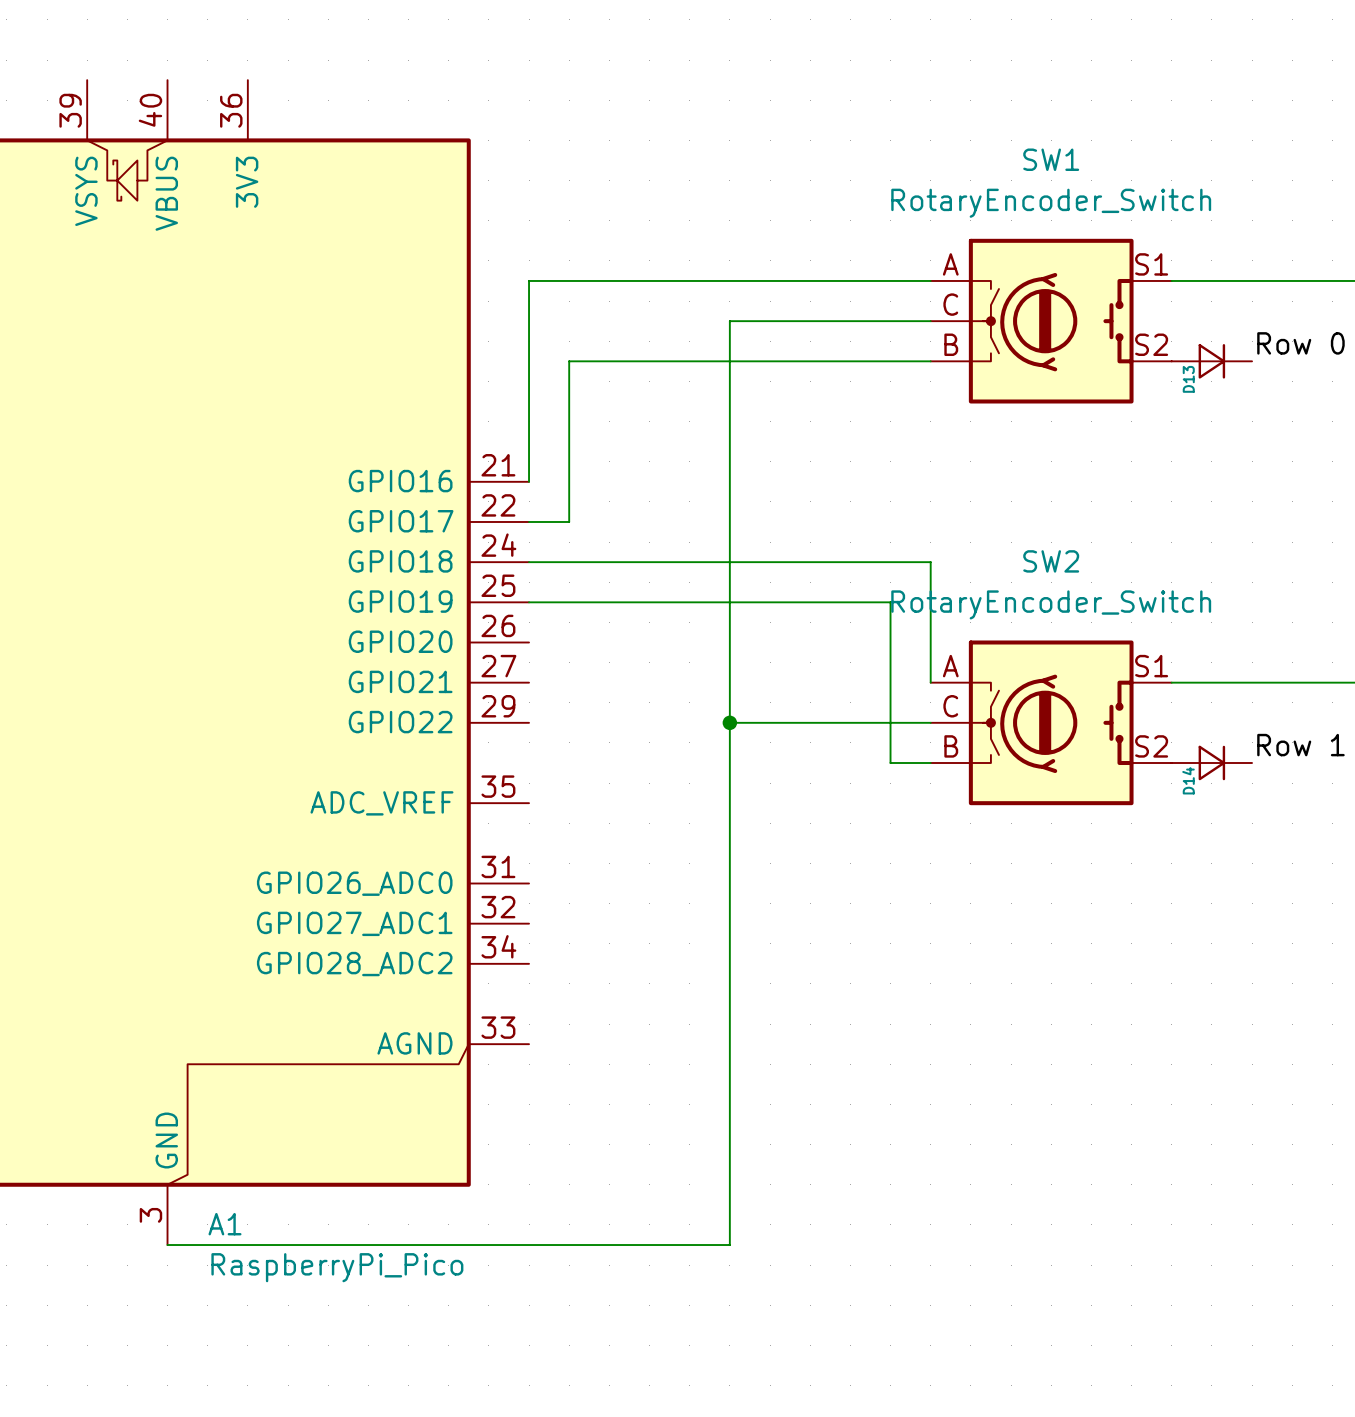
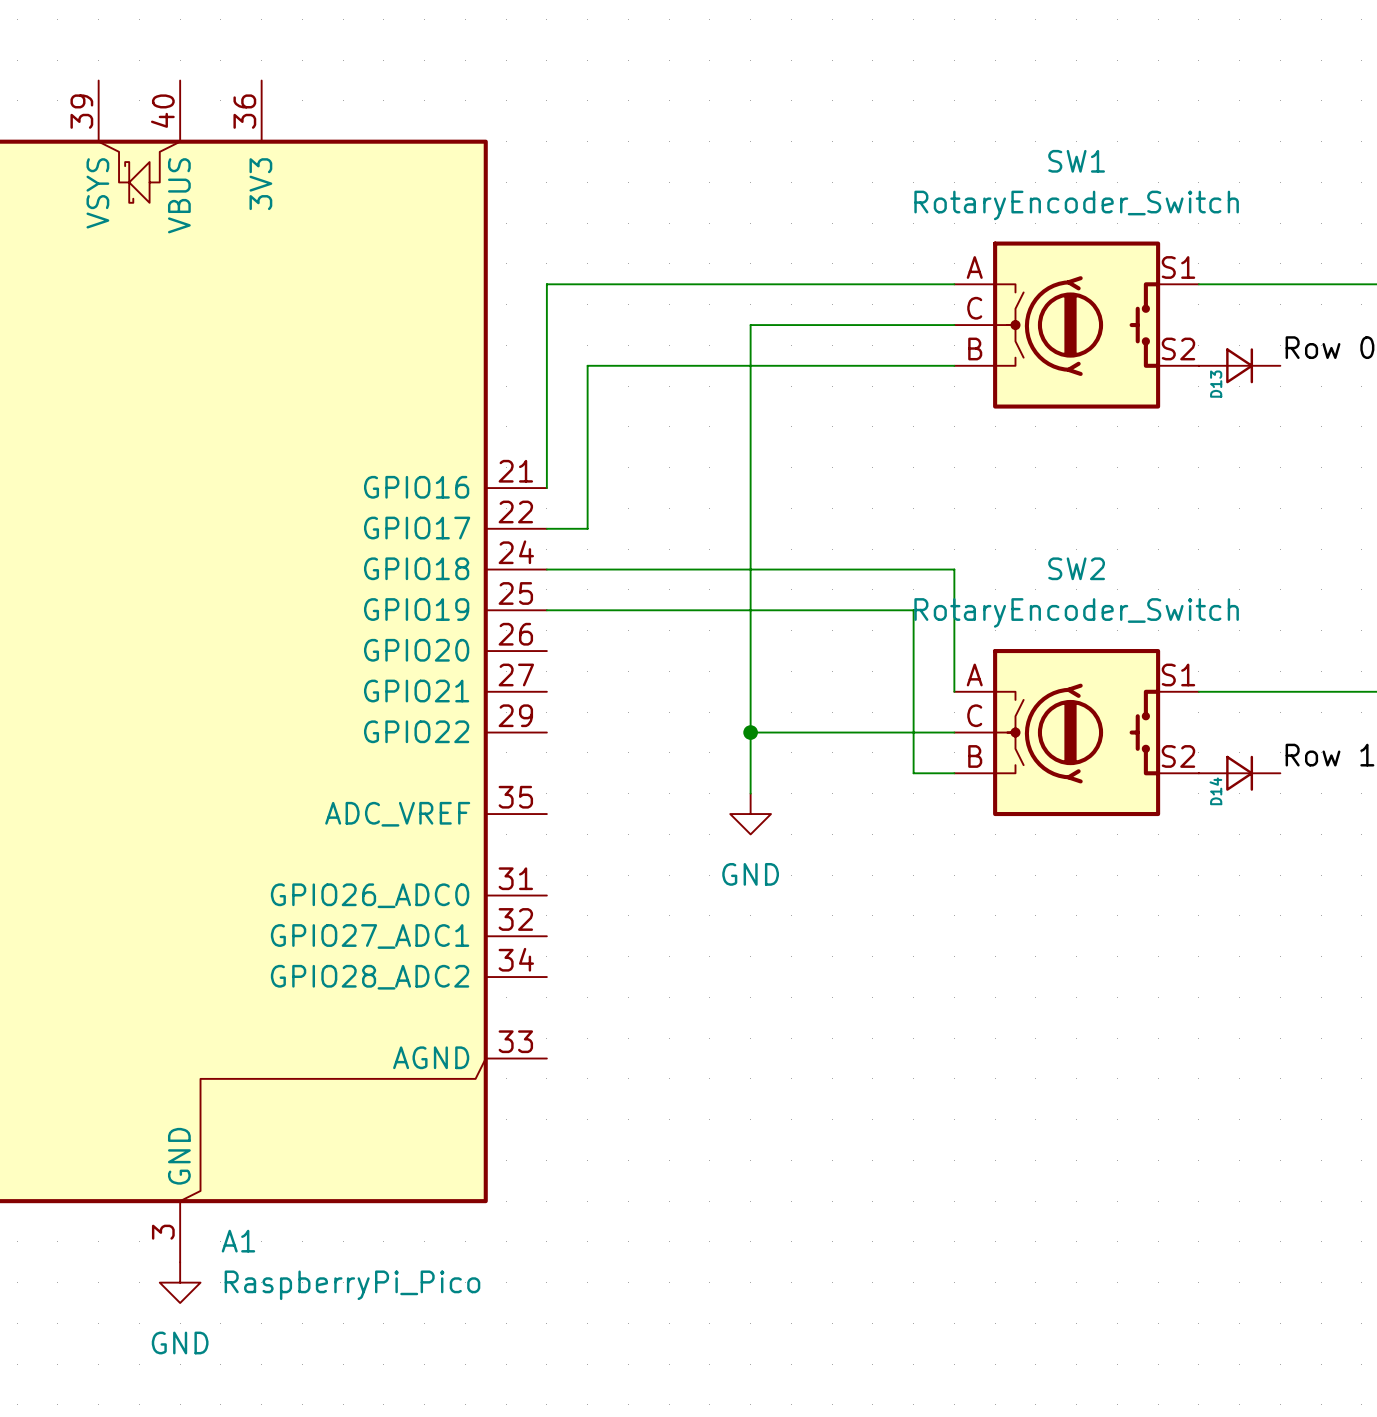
wire: (729, 783) (729, 1245) (167, 1245) -> none
power symbol: none -> GND (750, 814)
power symbol: none -> GND (180, 1282)

